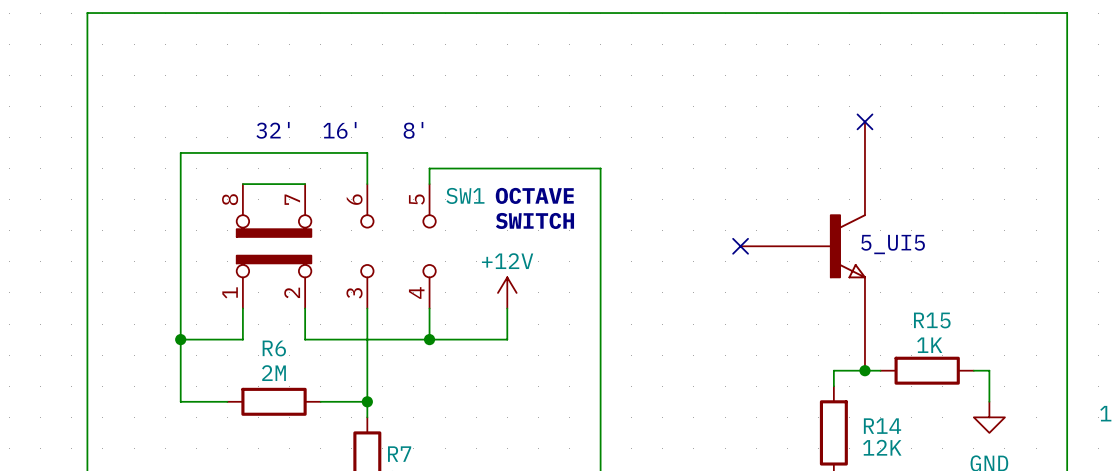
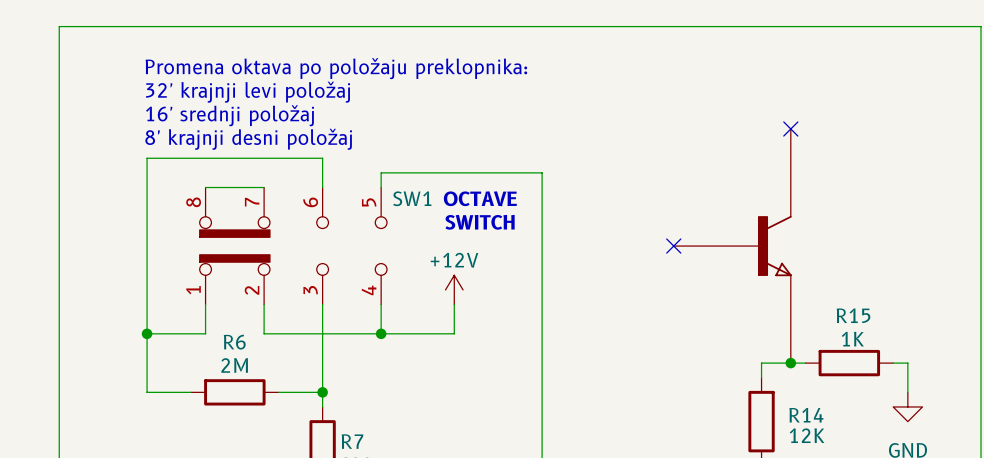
text: none -> Promena oktava po položaju preklopnika: (336, 68)
text: none -> 32' krajnji levi položaj (248, 92)
text: none -> 16' srednji položaj (229, 115)
text: 32' 16' 8' (339, 130) -> none
text: none -> 8' krajnji desni položaj (248, 139)
text: 5_UI5 (893, 244) -> none

